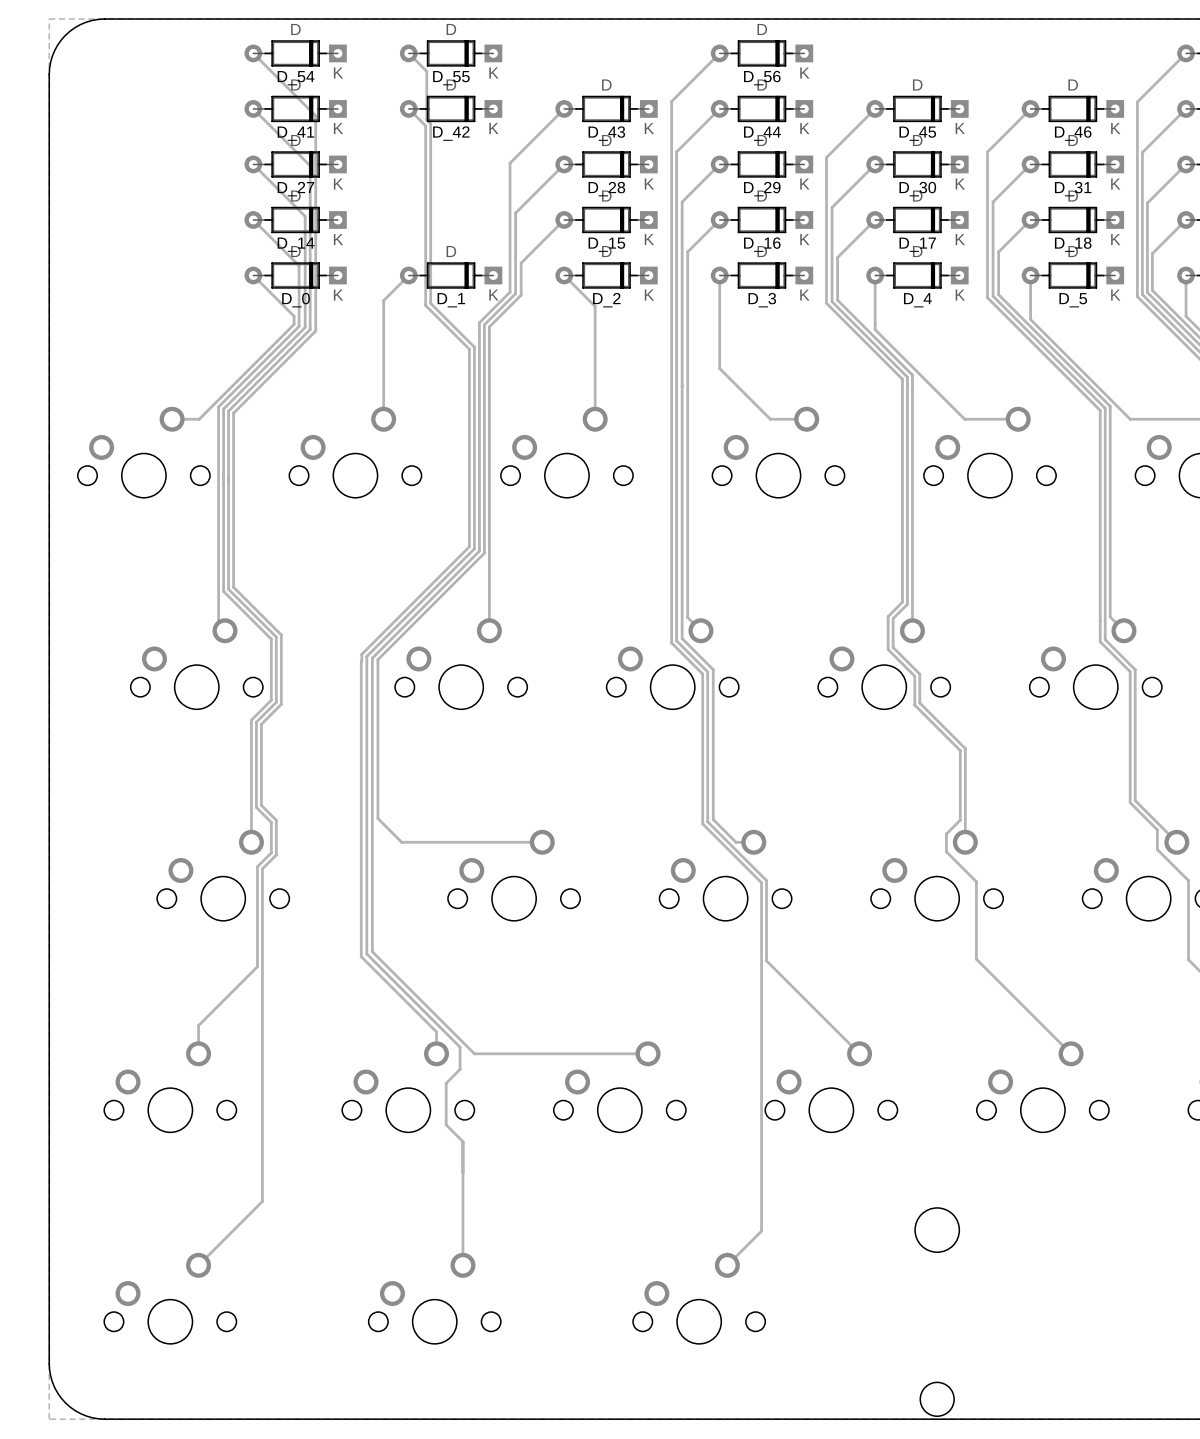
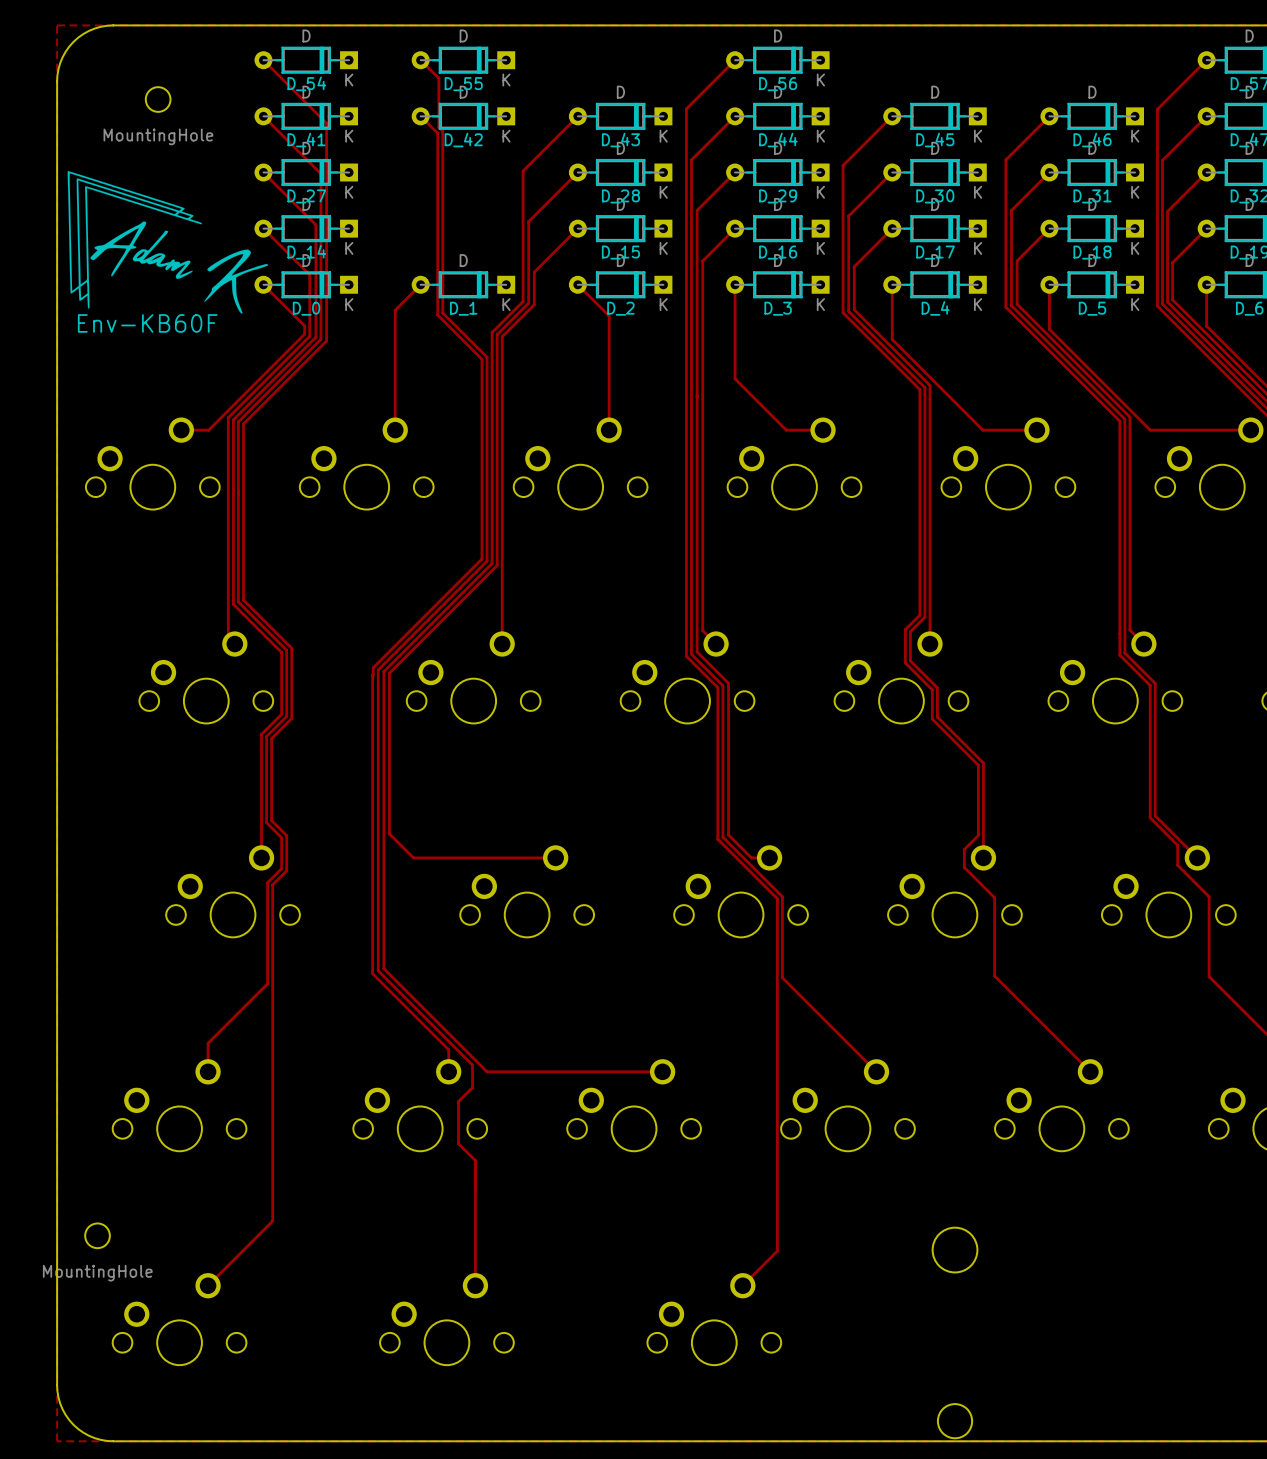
part: none -> MountingHole (158, 99)
drawing: none -> [67, 171, 269, 314]
text: none -> Env-KB60F (147, 323)
part: none -> MountingHole (97, 1235)

